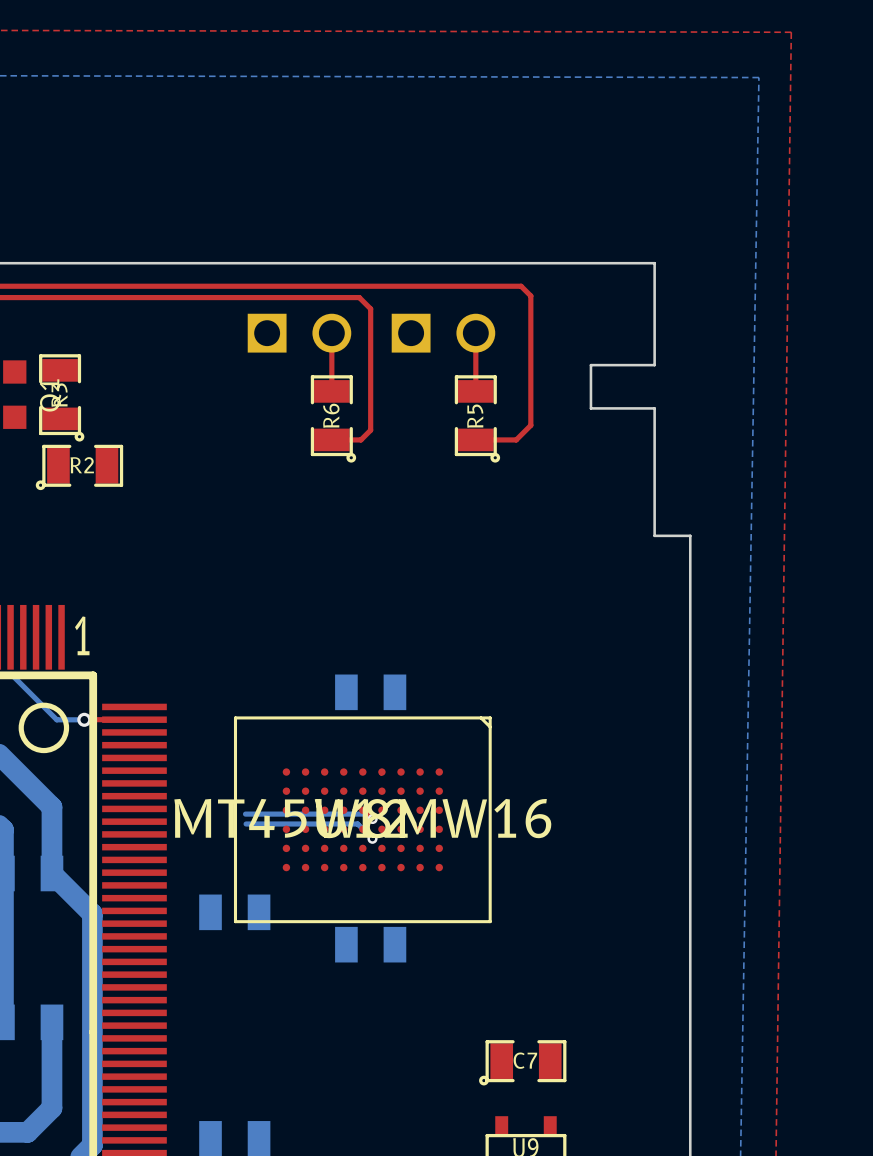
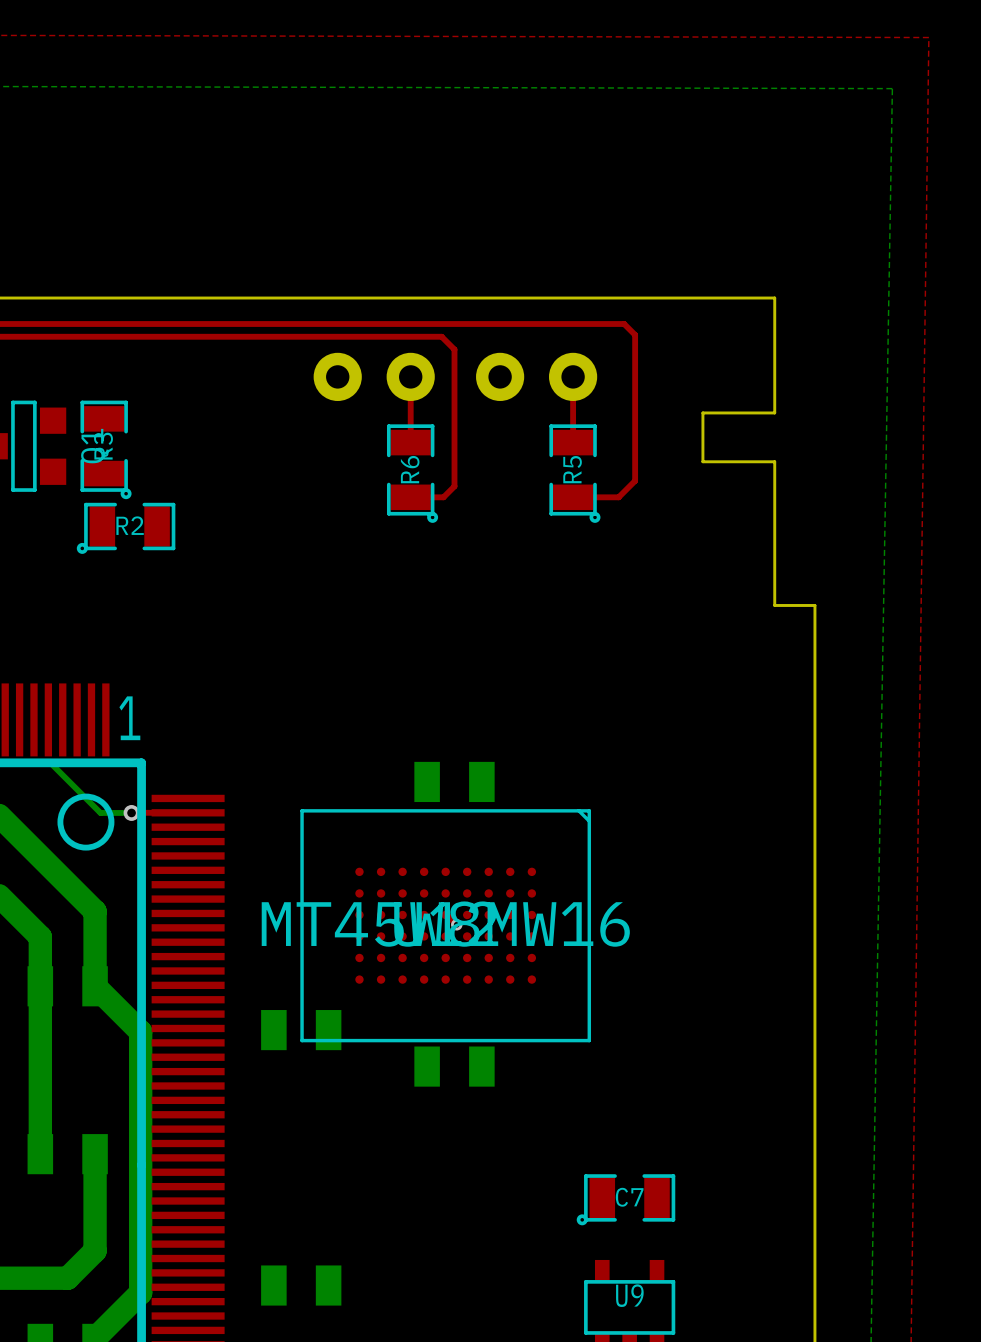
part footprint: [247, 313, 352, 353] -> [313, 352, 435, 401]
part footprint: [391, 313, 496, 353] -> [476, 352, 598, 401]
bottom track: (245, 814) (367, 814) (372, 818) -> none
bottom track: (246, 824) (357, 824) (372, 838) -> none
via: (372, 838) -> none

